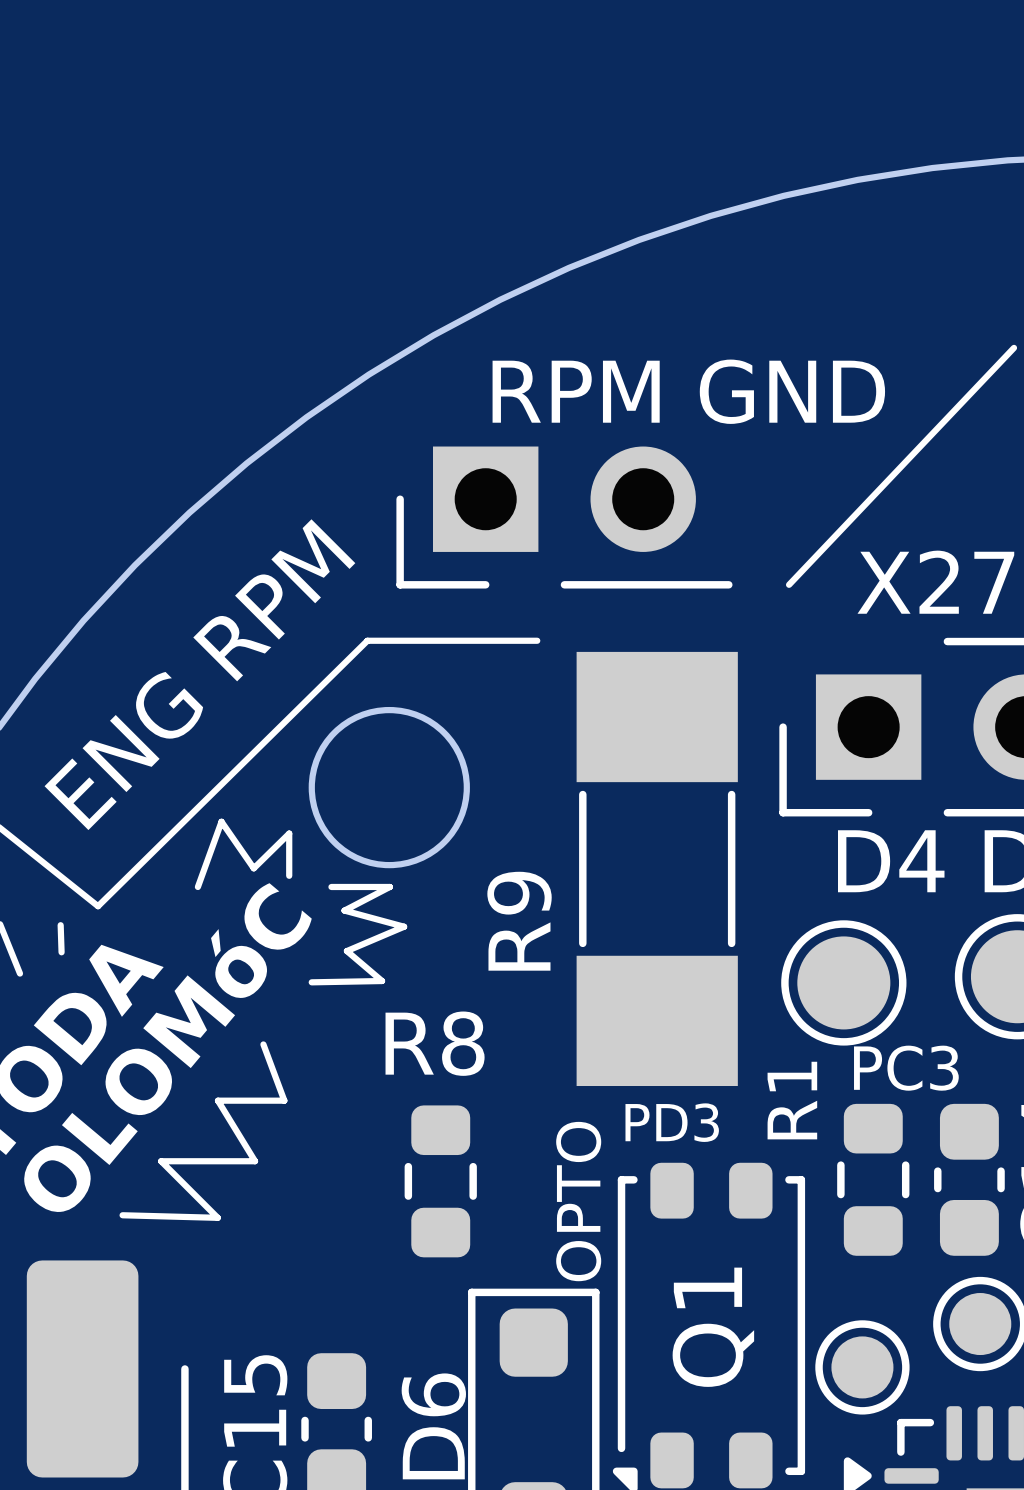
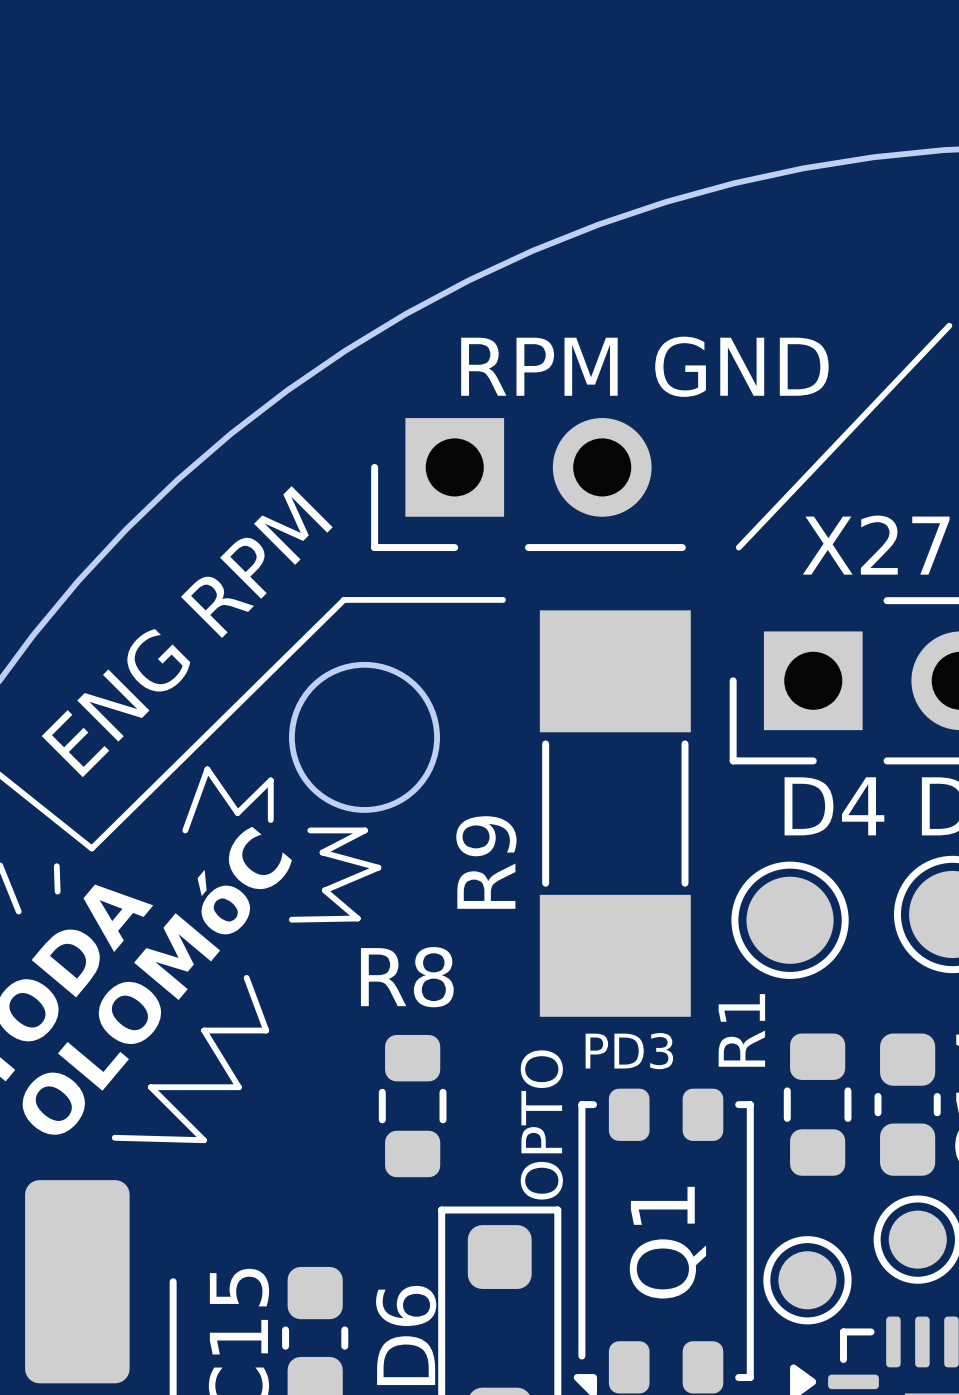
part text: PC3 (906, 1068) -> none

